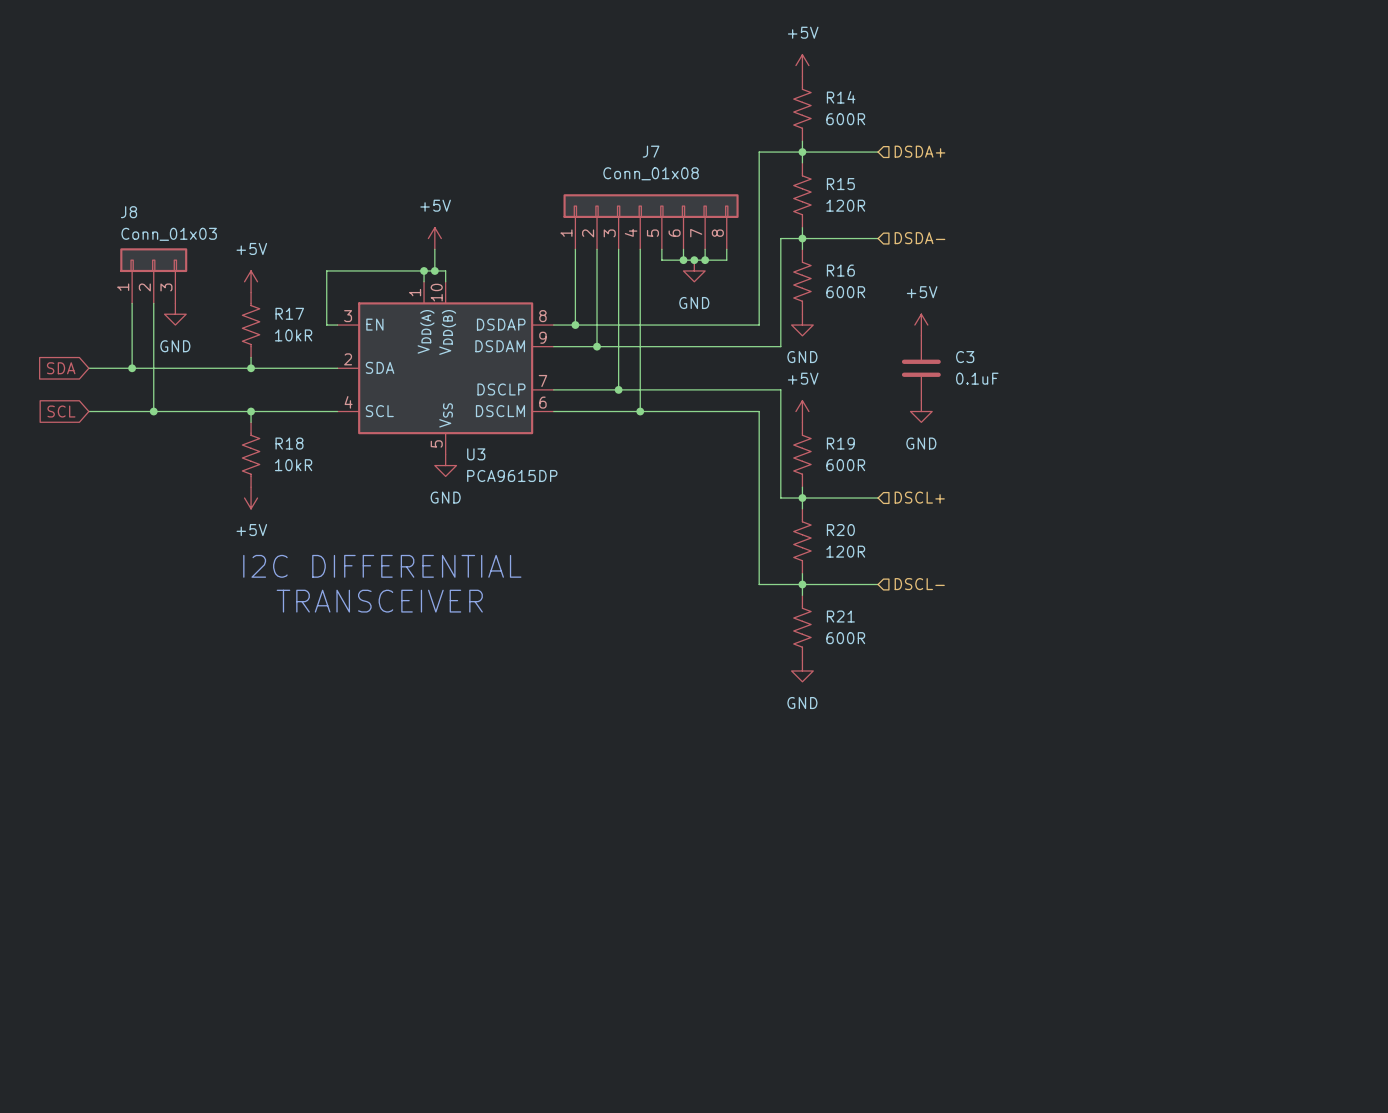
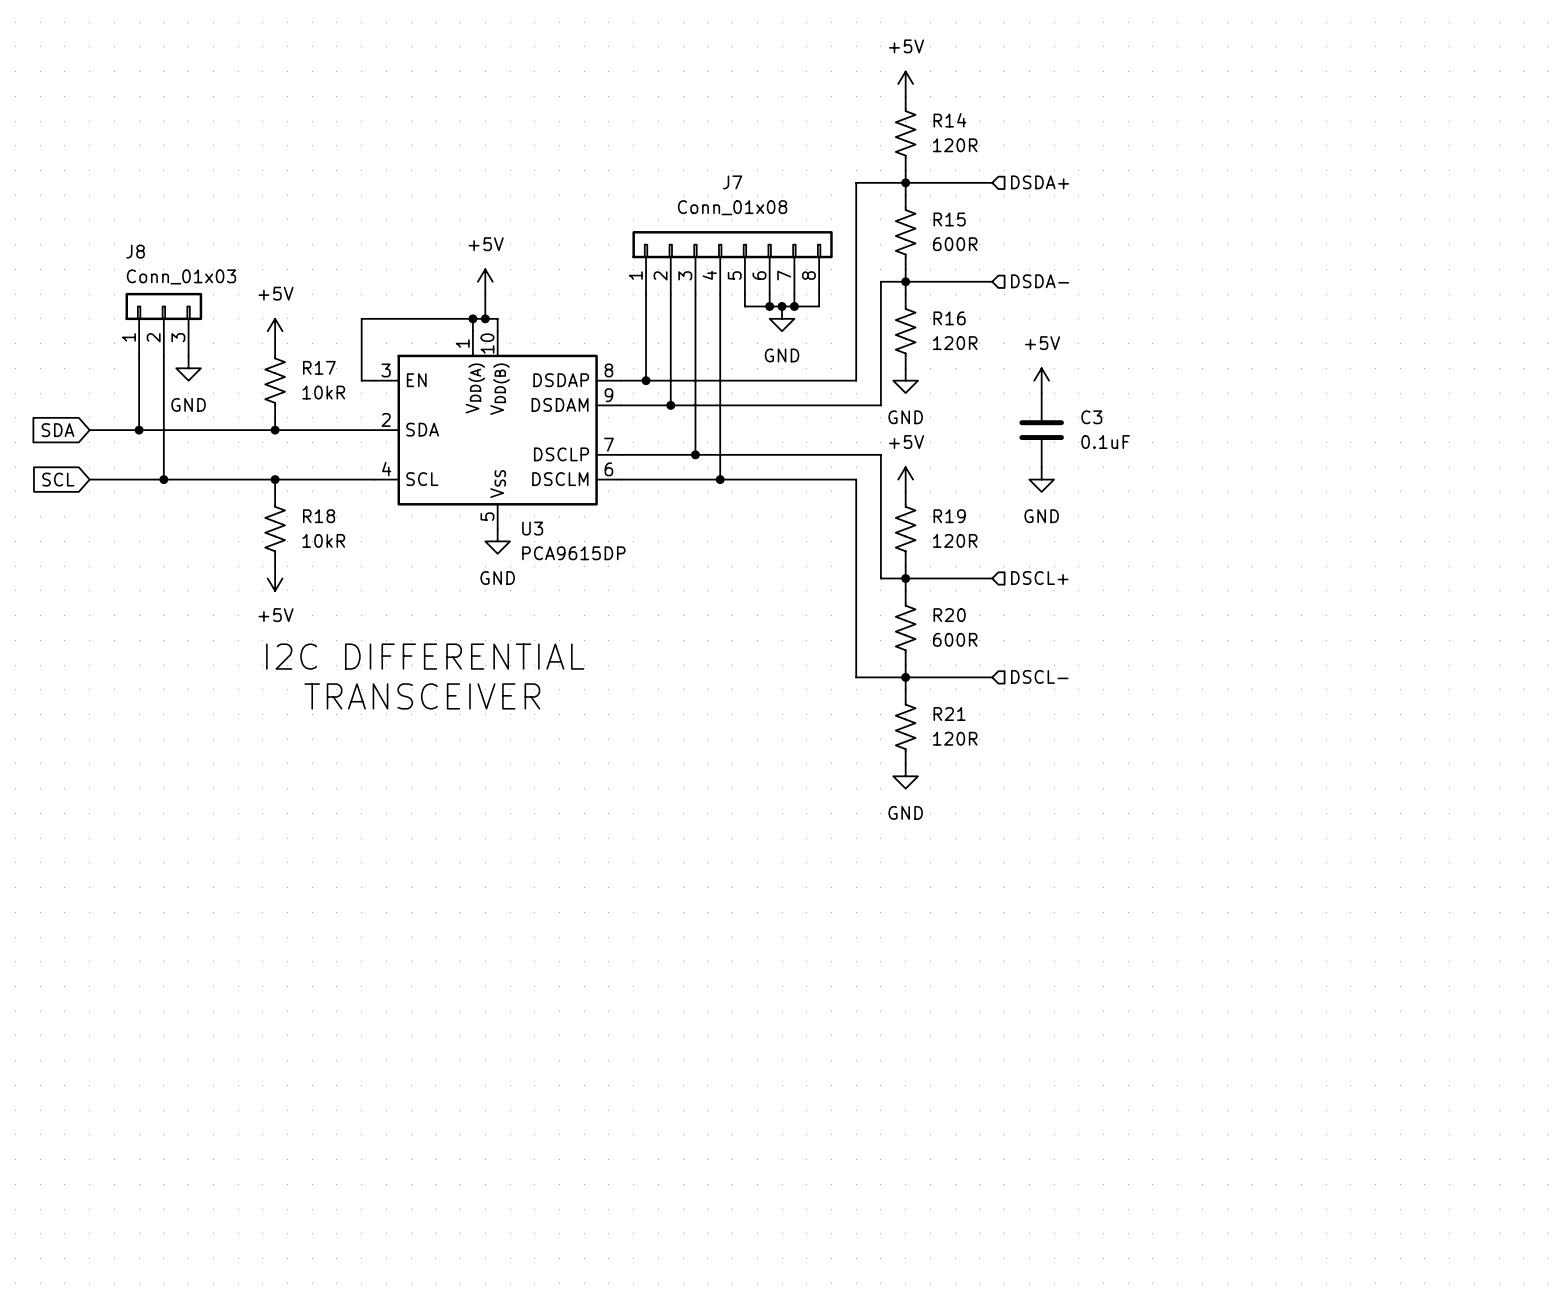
R14 value: 600R (845, 119) -> 120R (955, 145)
R15 value: 120R (845, 205) -> 600R (955, 244)
R16 value: 600R (845, 292) -> 120R (955, 343)
R19 value: 600R (845, 465) -> 120R (955, 540)
R20 value: 120R (845, 551) -> 600R (955, 639)
R21 value: 600R (845, 638) -> 120R (955, 738)

